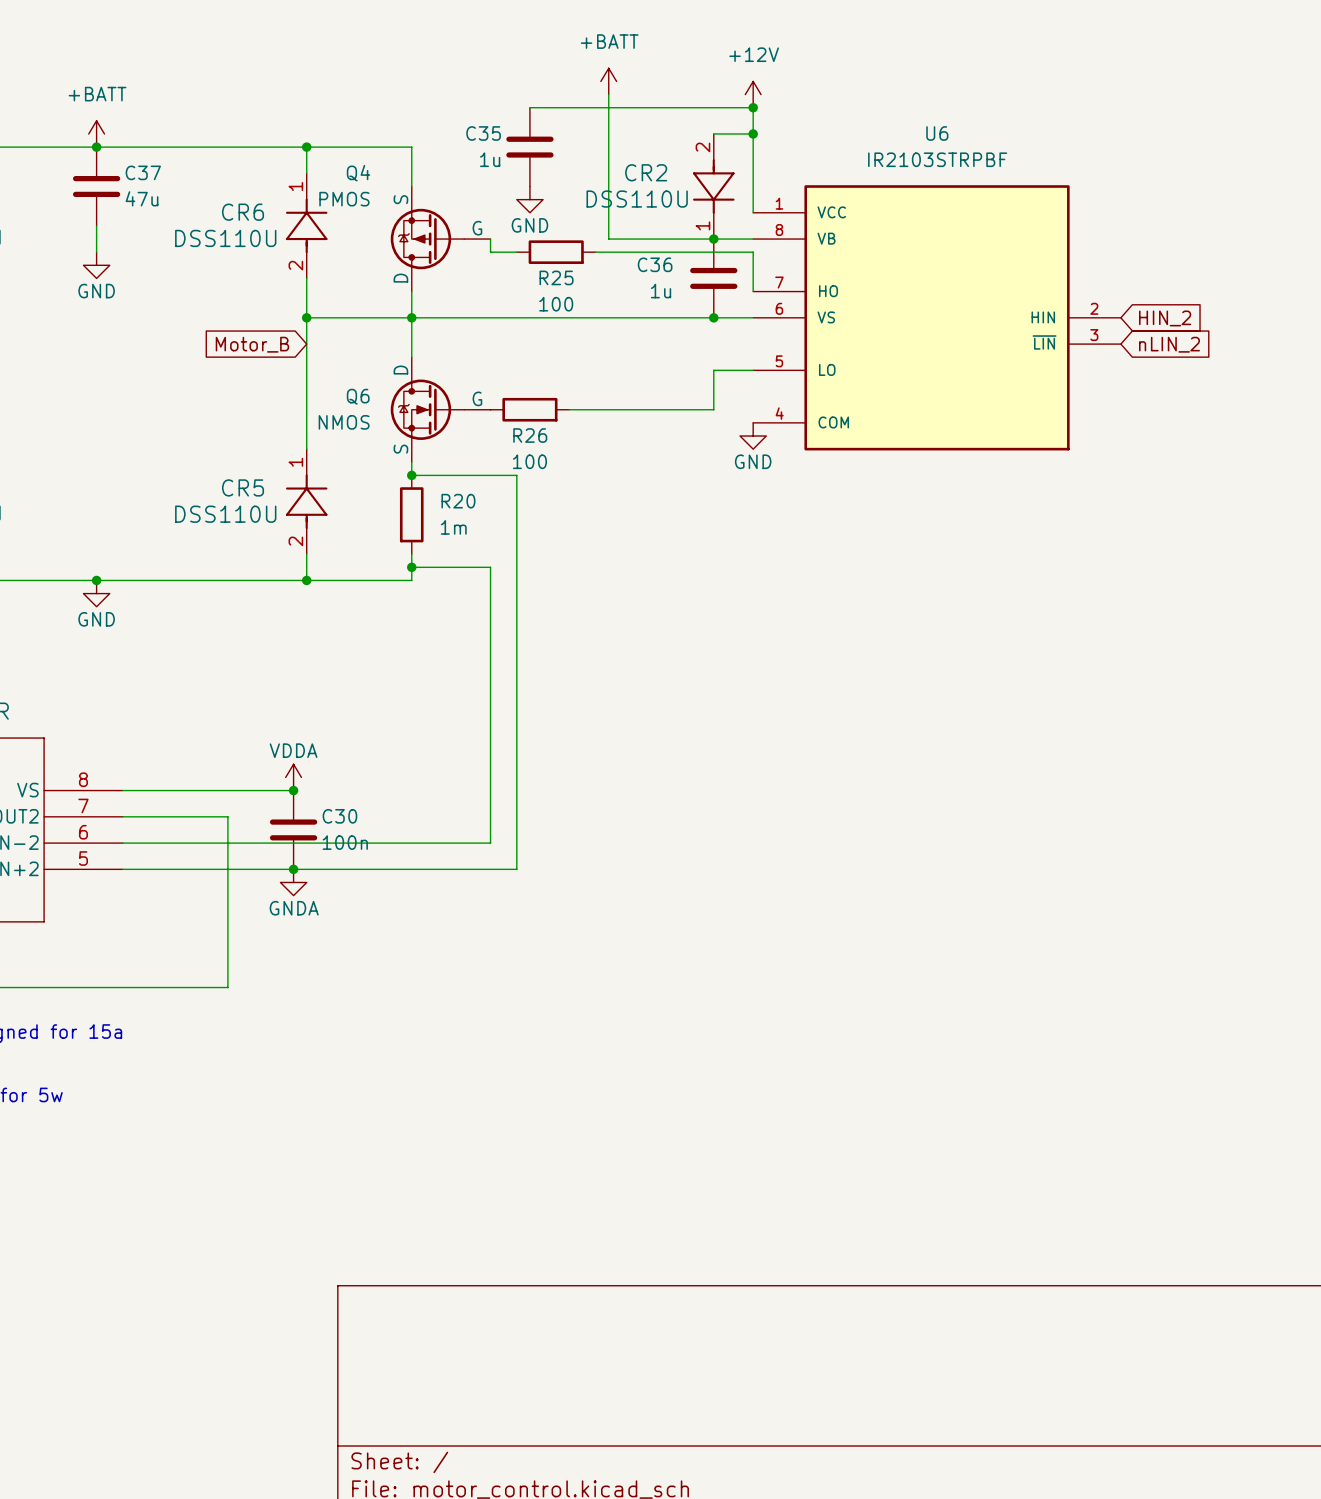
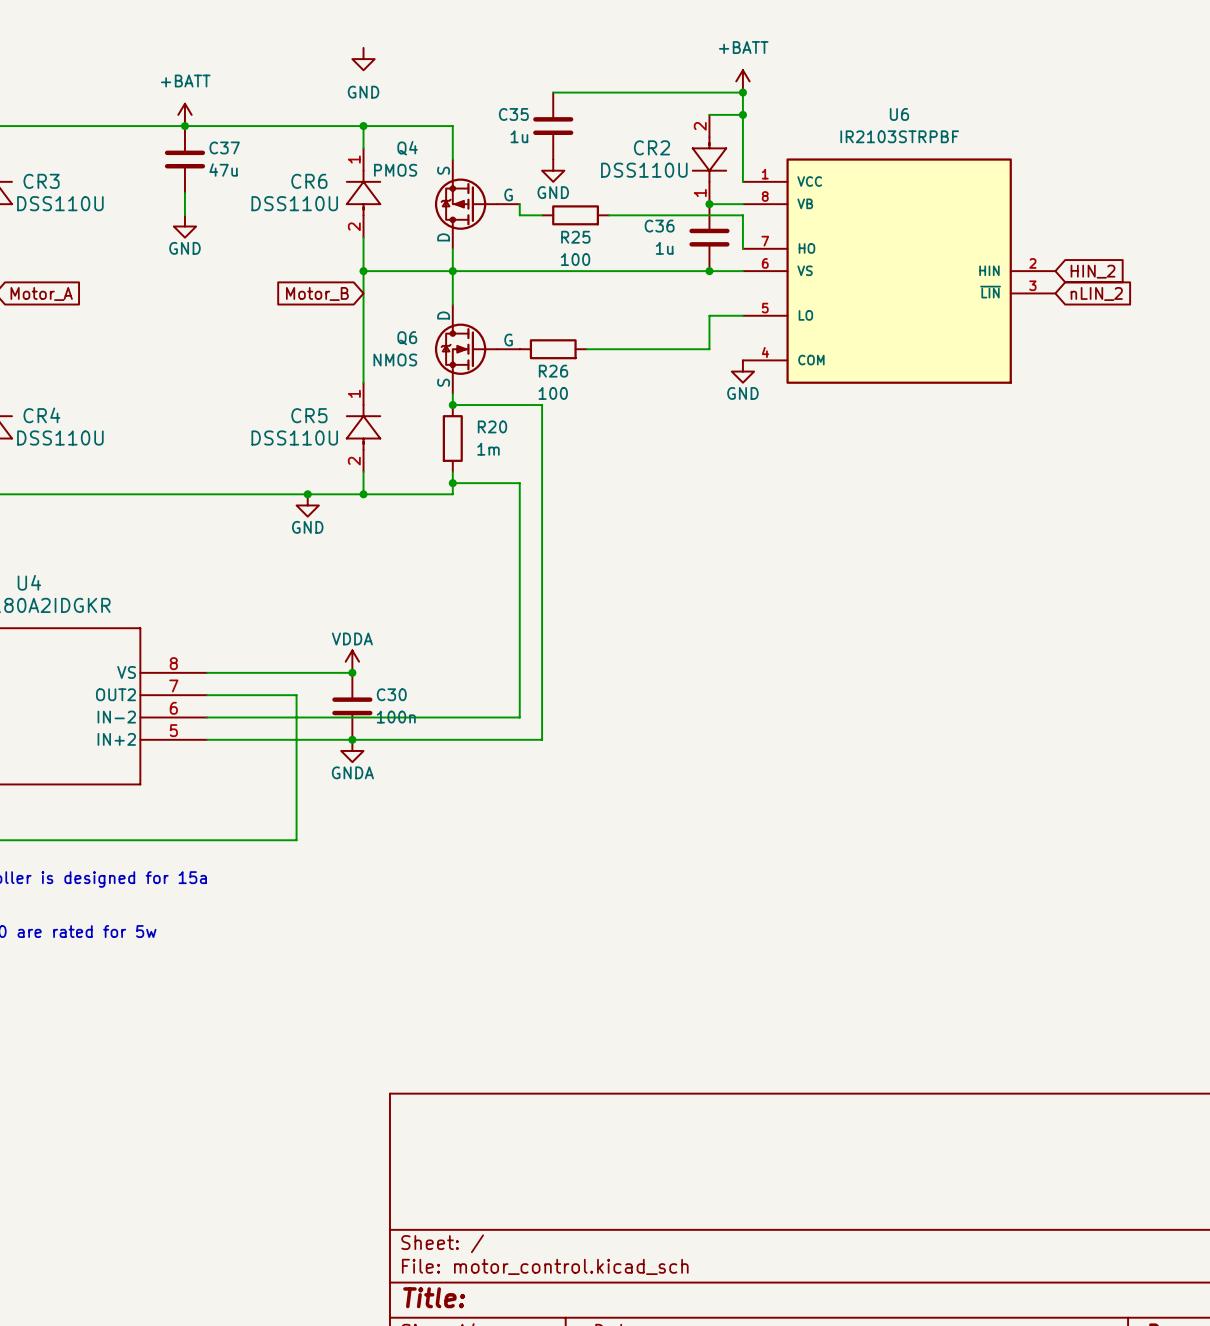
power symbol: none -> GND (363, 59)
power symbol: +BATT (608, 81) -> none
wire: (608, 94) (608, 239) (713, 239) -> none
power symbol: +12V (753, 94) -> +BATT (742, 81)
junction: (96, 580) -> none
junction: none -> (307, 494)
power symbol position: GND (96, 593) -> GND (307, 505)

